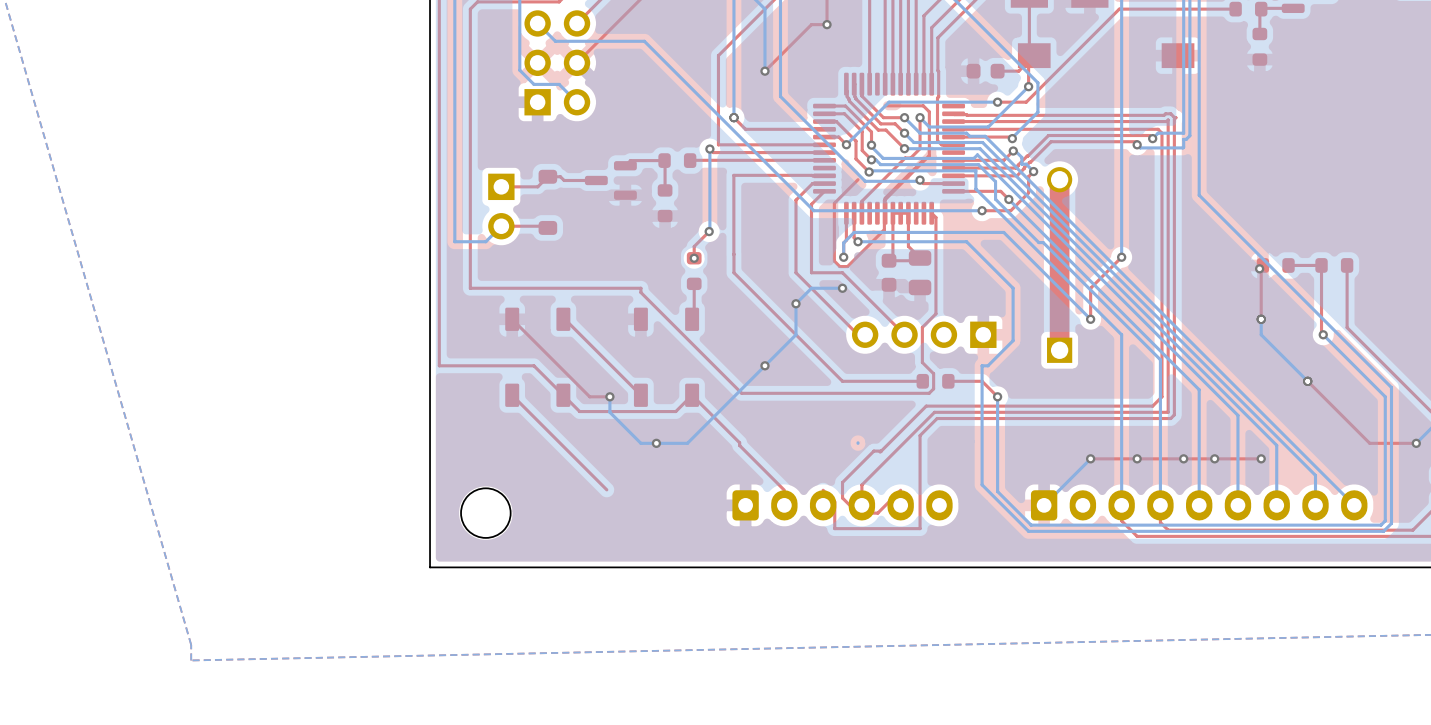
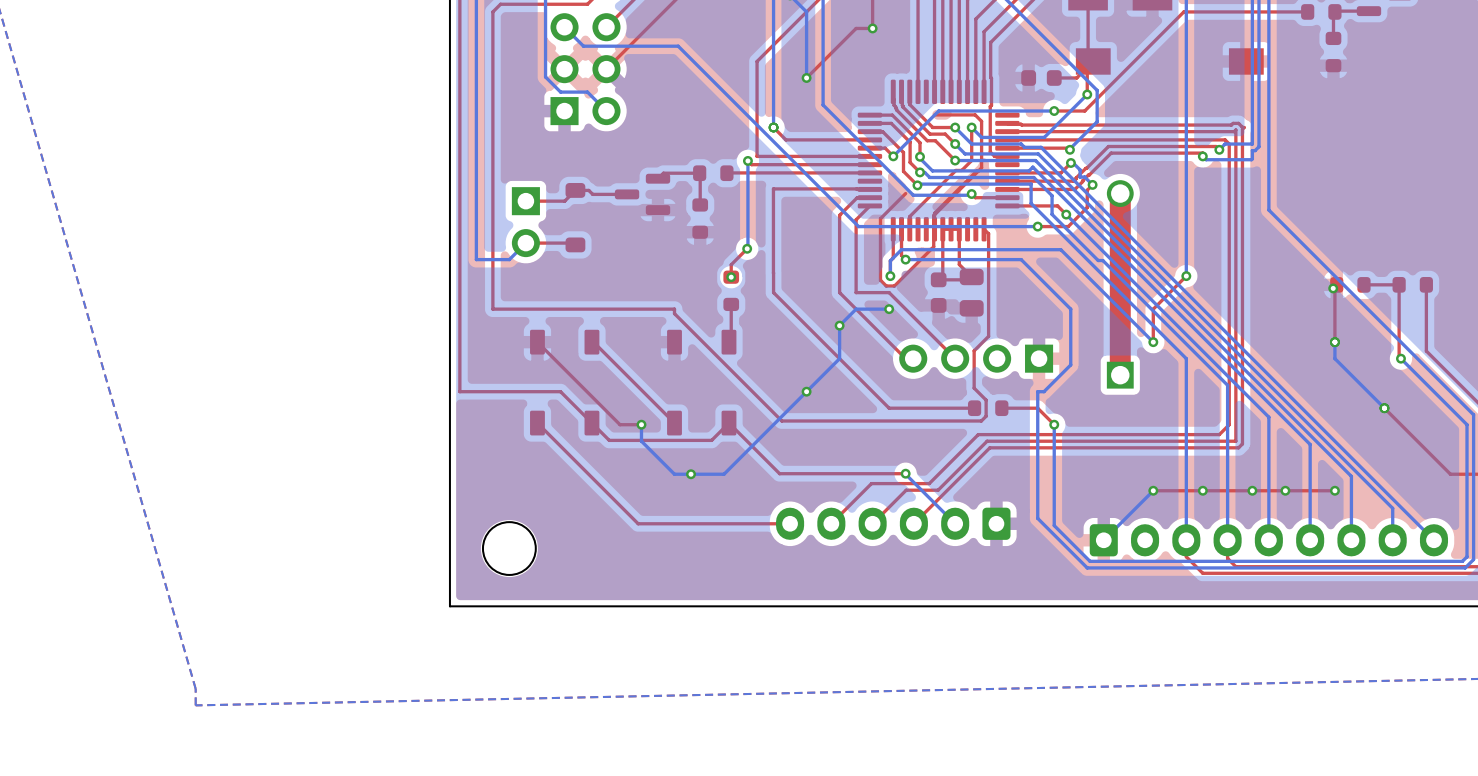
top track: (920, 435) (920, 528) (834, 528) (834, 501) (823, 490) -> (971, 465) (913, 523)
top track: (739, 442) (739, 445) (784, 490) -> (779, 473) (905, 473)
via: none -> (905, 473)
bottom track: none -> (905, 474) (955, 523)
top track: (881, 451) (873, 451) (842, 482) (842, 498) (857, 513) (877, 513) (900, 490) -> none
top track: none -> (929, 483) (871, 483) (831, 523)
top track: (888, 458) (861, 484) (861, 490) -> (938, 490) (906, 490) (872, 523)
top track: none -> (790, 523) (638, 523)
part rotation: 0° (842, 505) -> 180° (893, 523)

